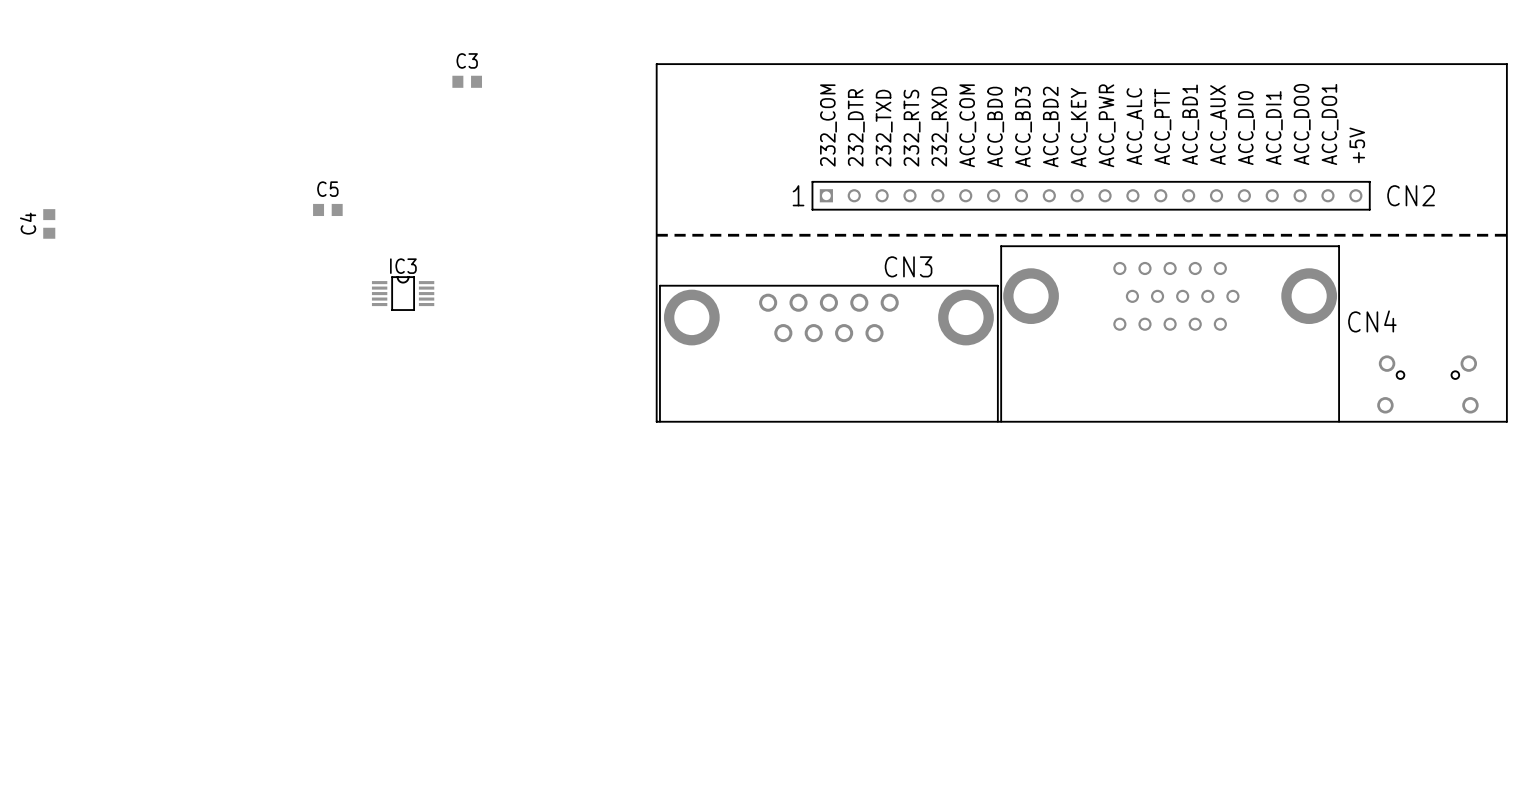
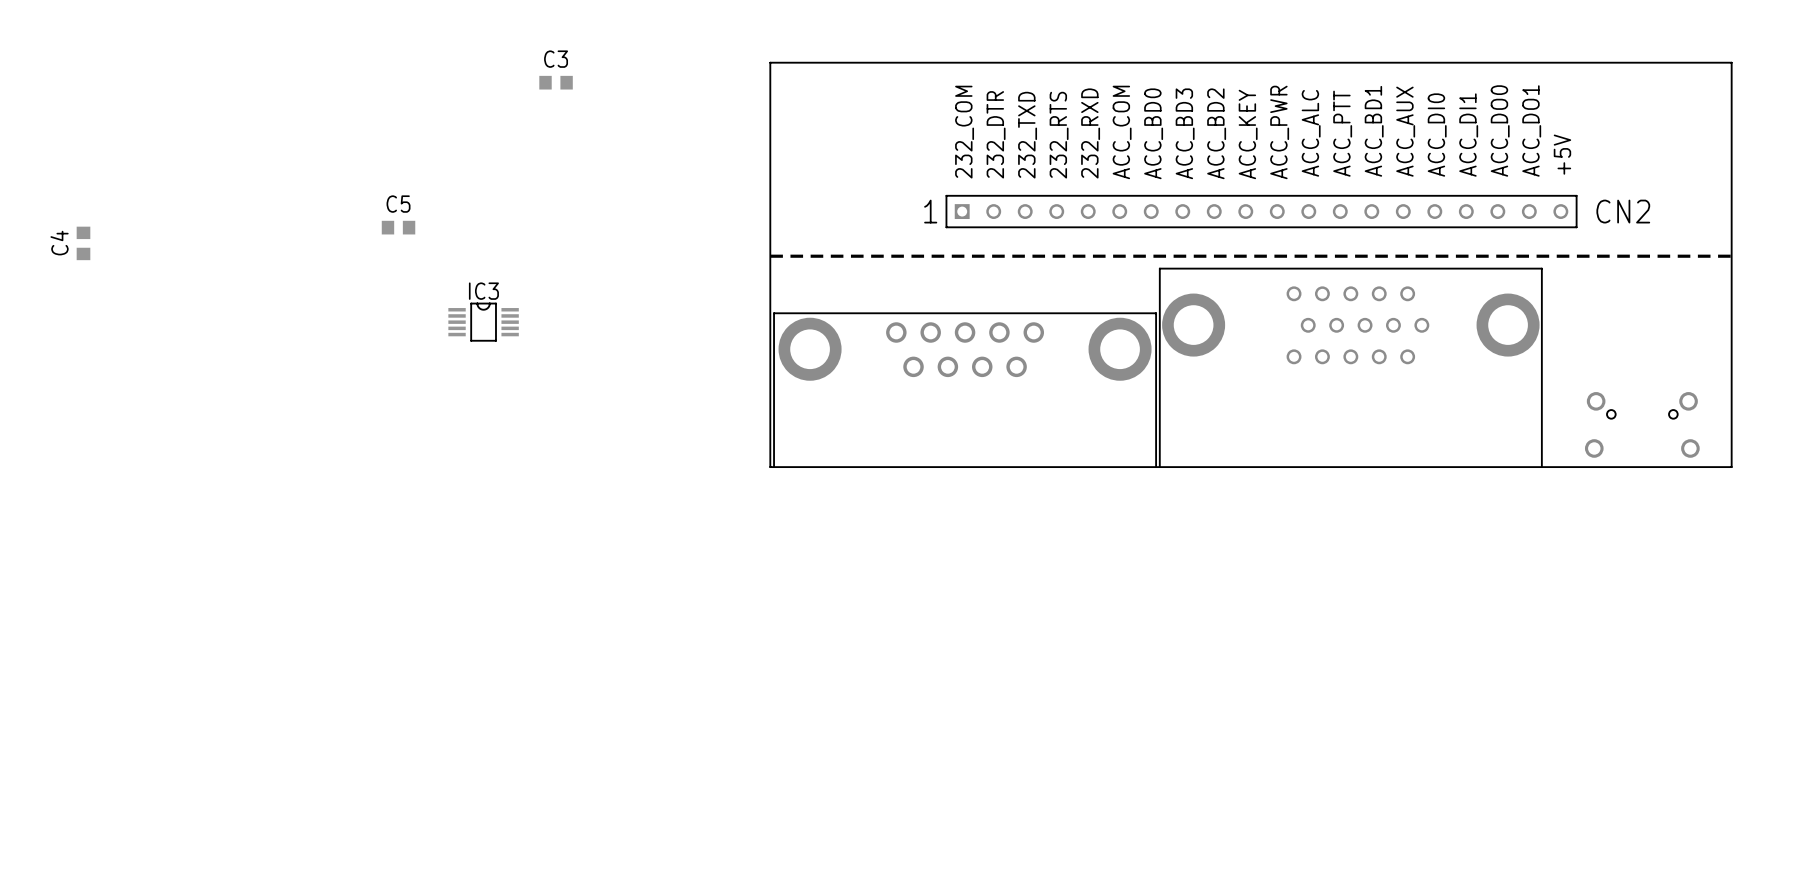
CN3 name: CN3 (908, 266) -> none
CN4 name: CN4 (1372, 321) -> none

